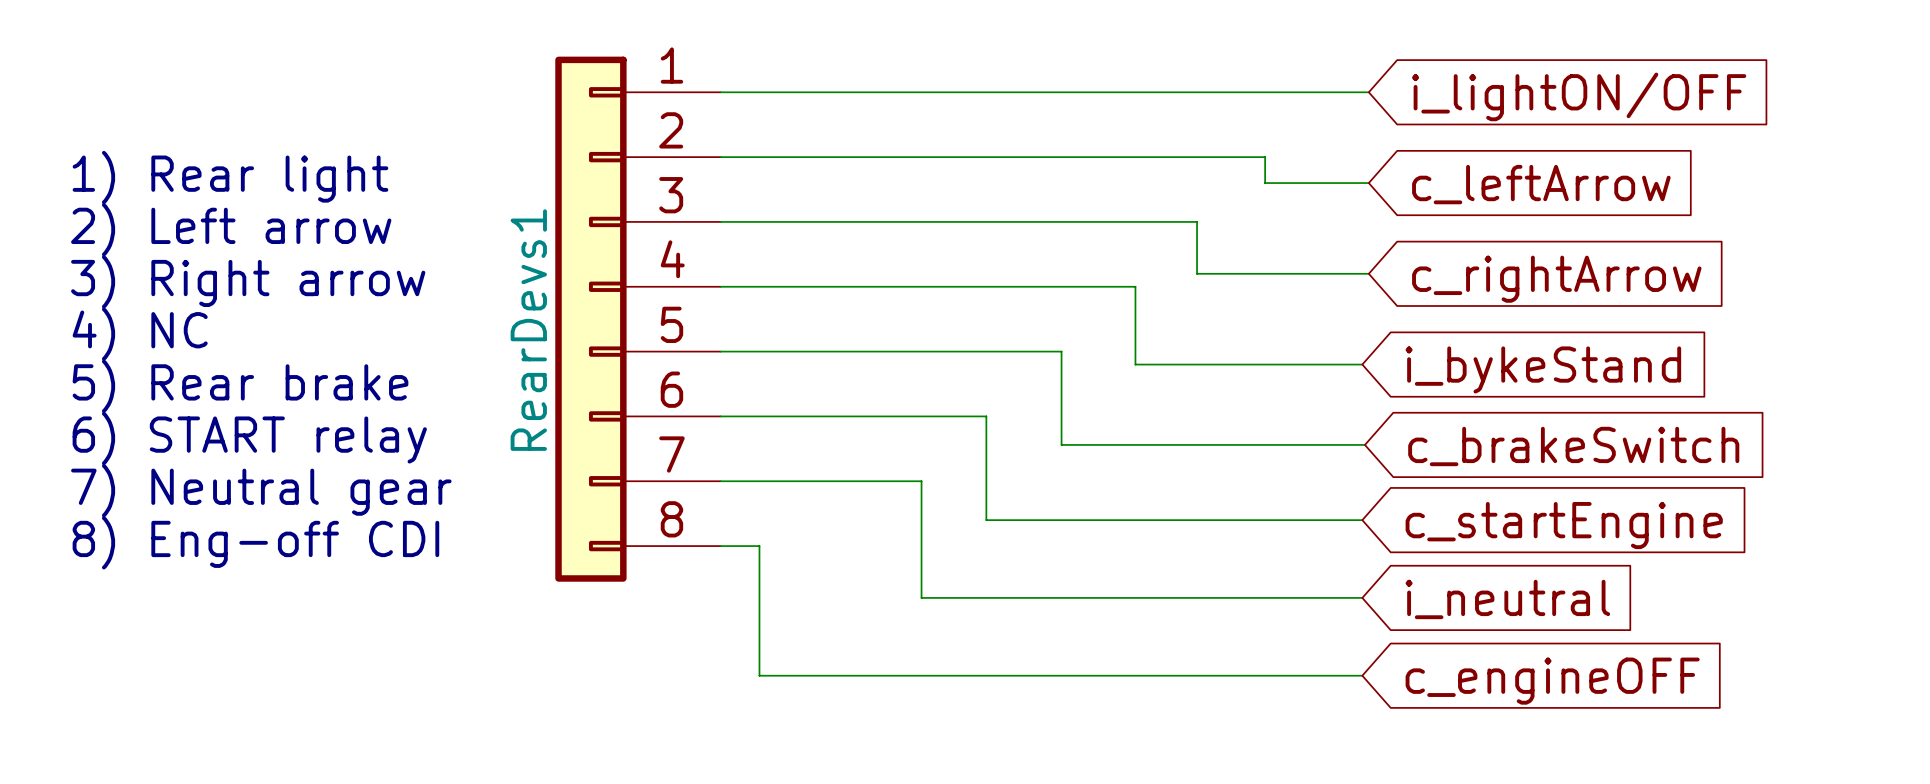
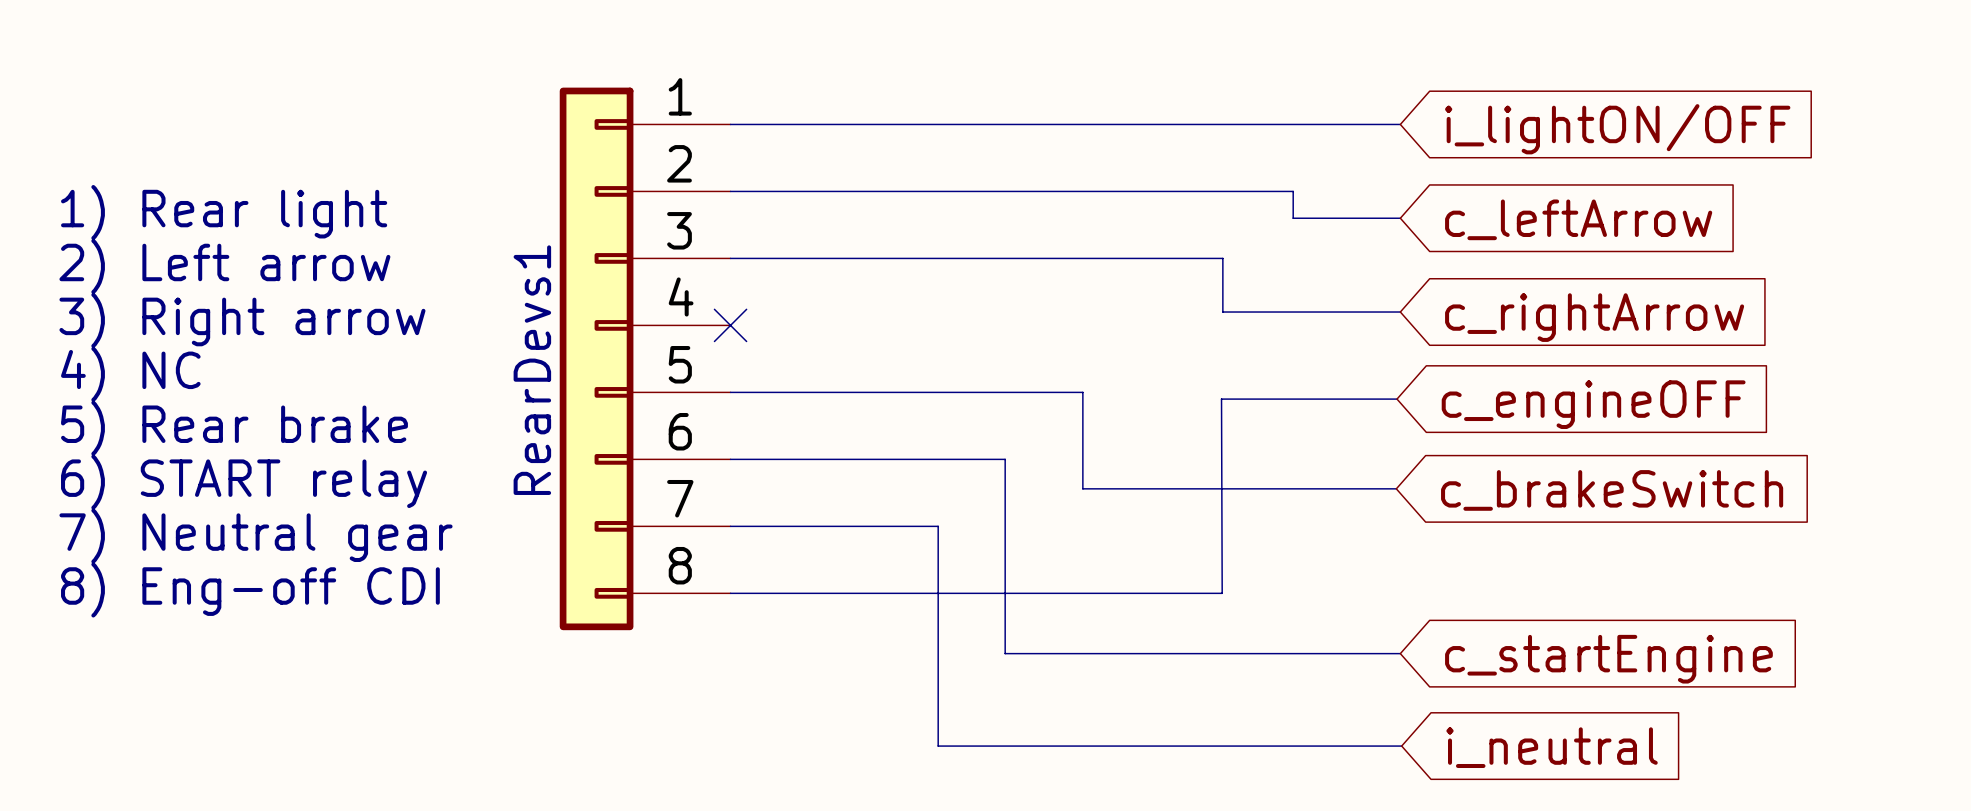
wire: (720, 286) (1135, 286) (1135, 364) (1362, 364) -> none
no-connect mark: none -> (730, 325)
global label: i_bykeStand (1543, 369) -> c_engineOFF (1593, 404)
wire: (986, 520) (1362, 520) -> (1005, 566) (1005, 653) (1400, 653)
global label: c_startEngine (1564, 525) -> none
wire: (759, 546) (759, 675) (1362, 675) -> (770, 593) (1222, 593) (1221, 399) (1397, 399)
wire: (921, 597) (1362, 597) -> (938, 646) (938, 746) (1401, 746)
global label: i_neutral (1507, 599) -> c_startEngine (1608, 659)
global label: c_engineOFF (1552, 681) -> i_neutral (1552, 747)

